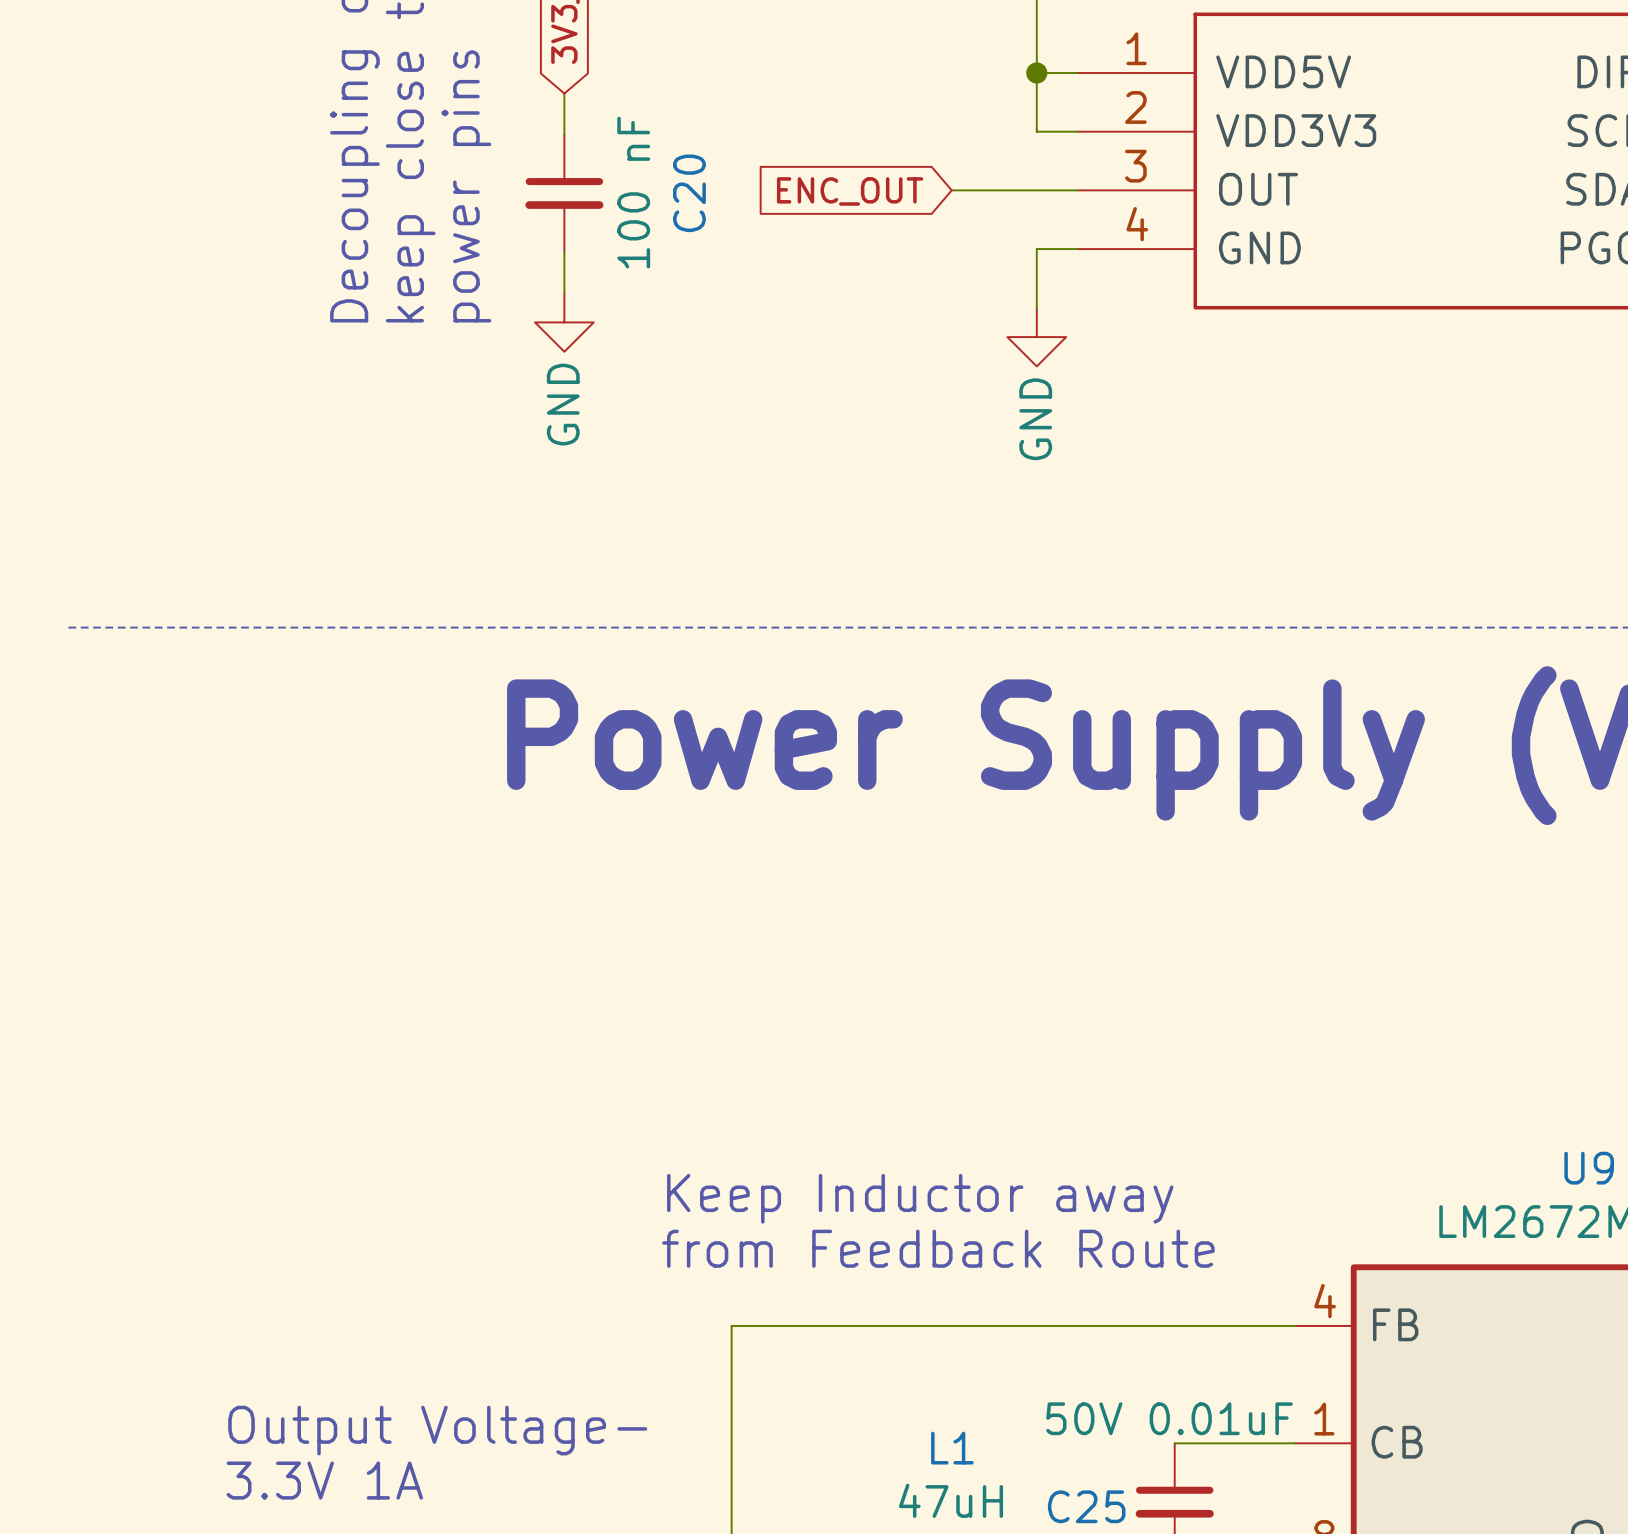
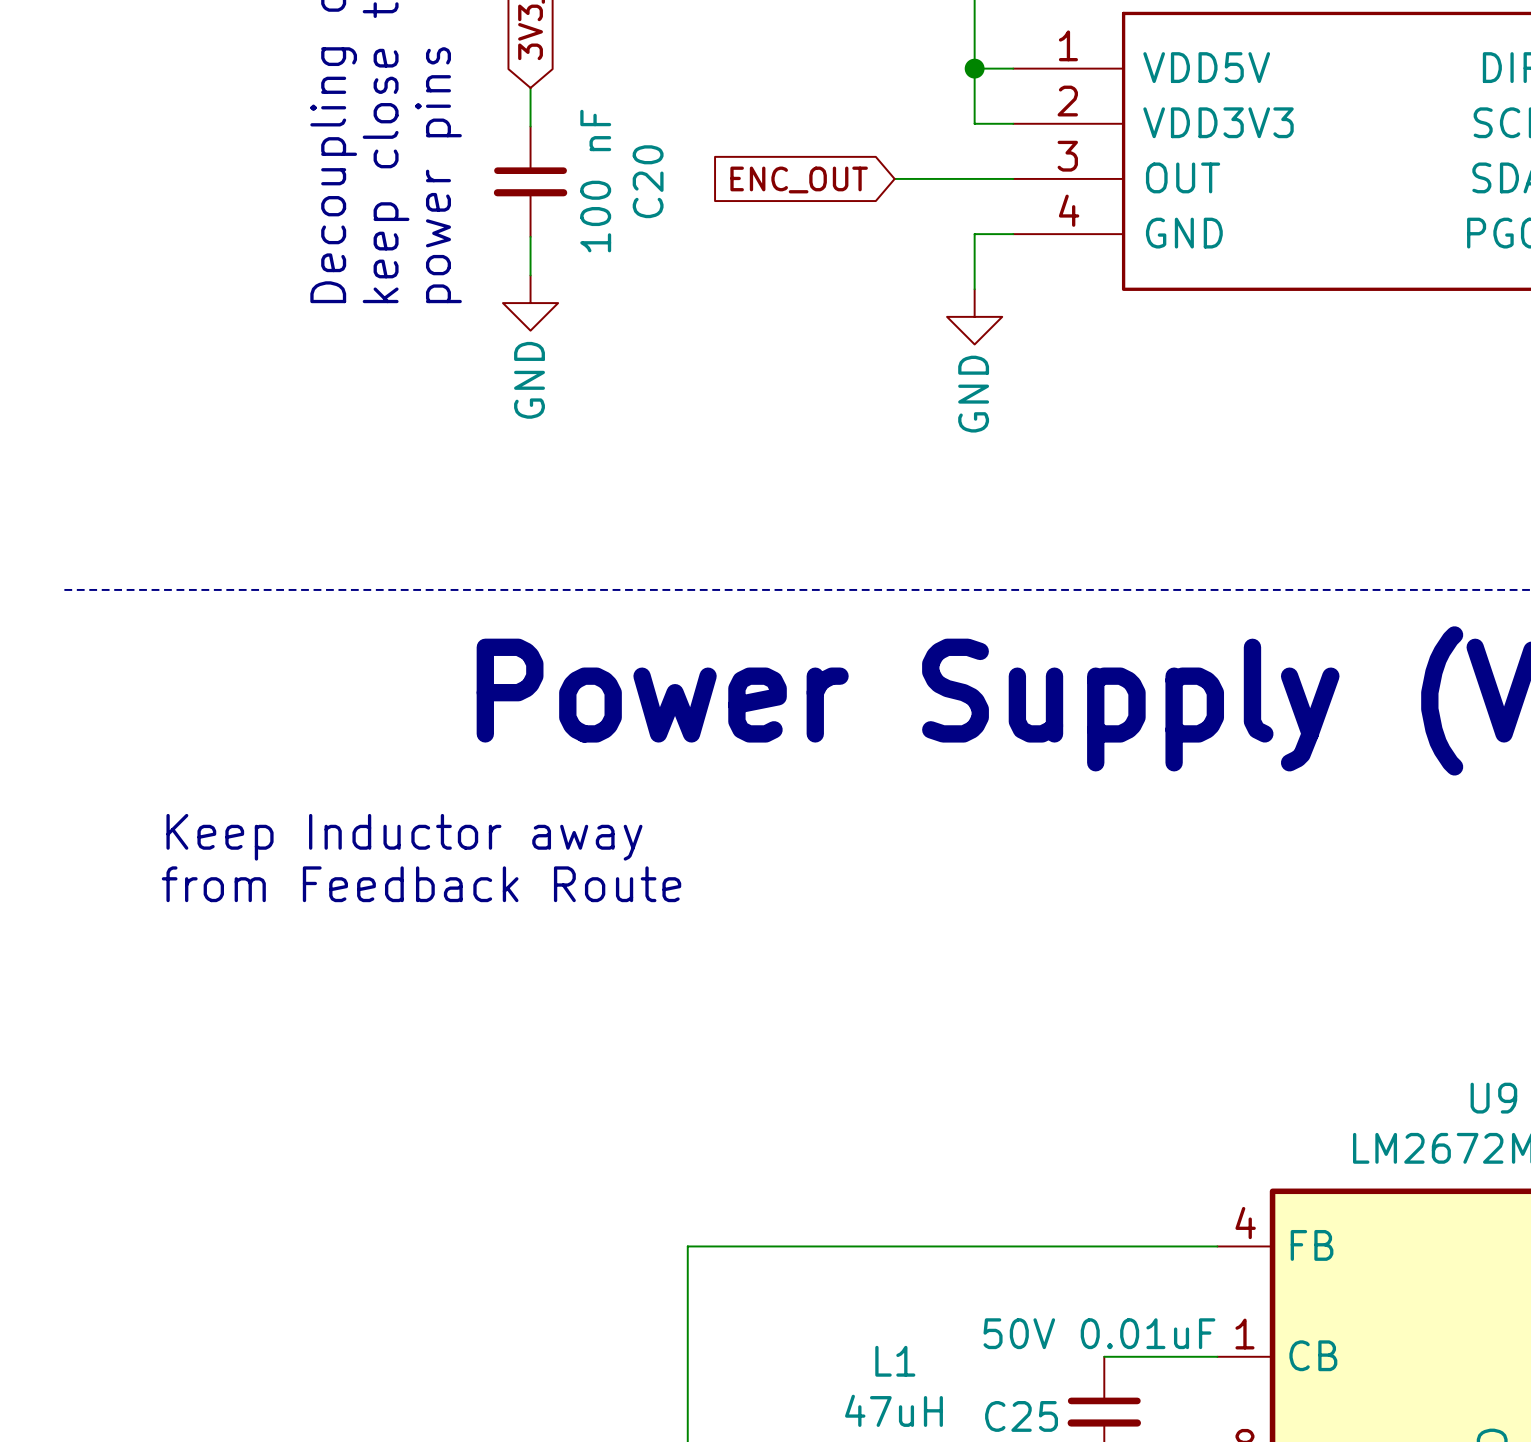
text: none -> Keep Inductor away (404, 837)
text: none -> from Feedback Route (421, 884)
text: Keep Inductor away (920, 1198) -> none
text: from Feedback Route (938, 1248) -> none
text: Output Voltage- (437, 1430) -> none
text: 3.3V 1A (324, 1480) -> none

